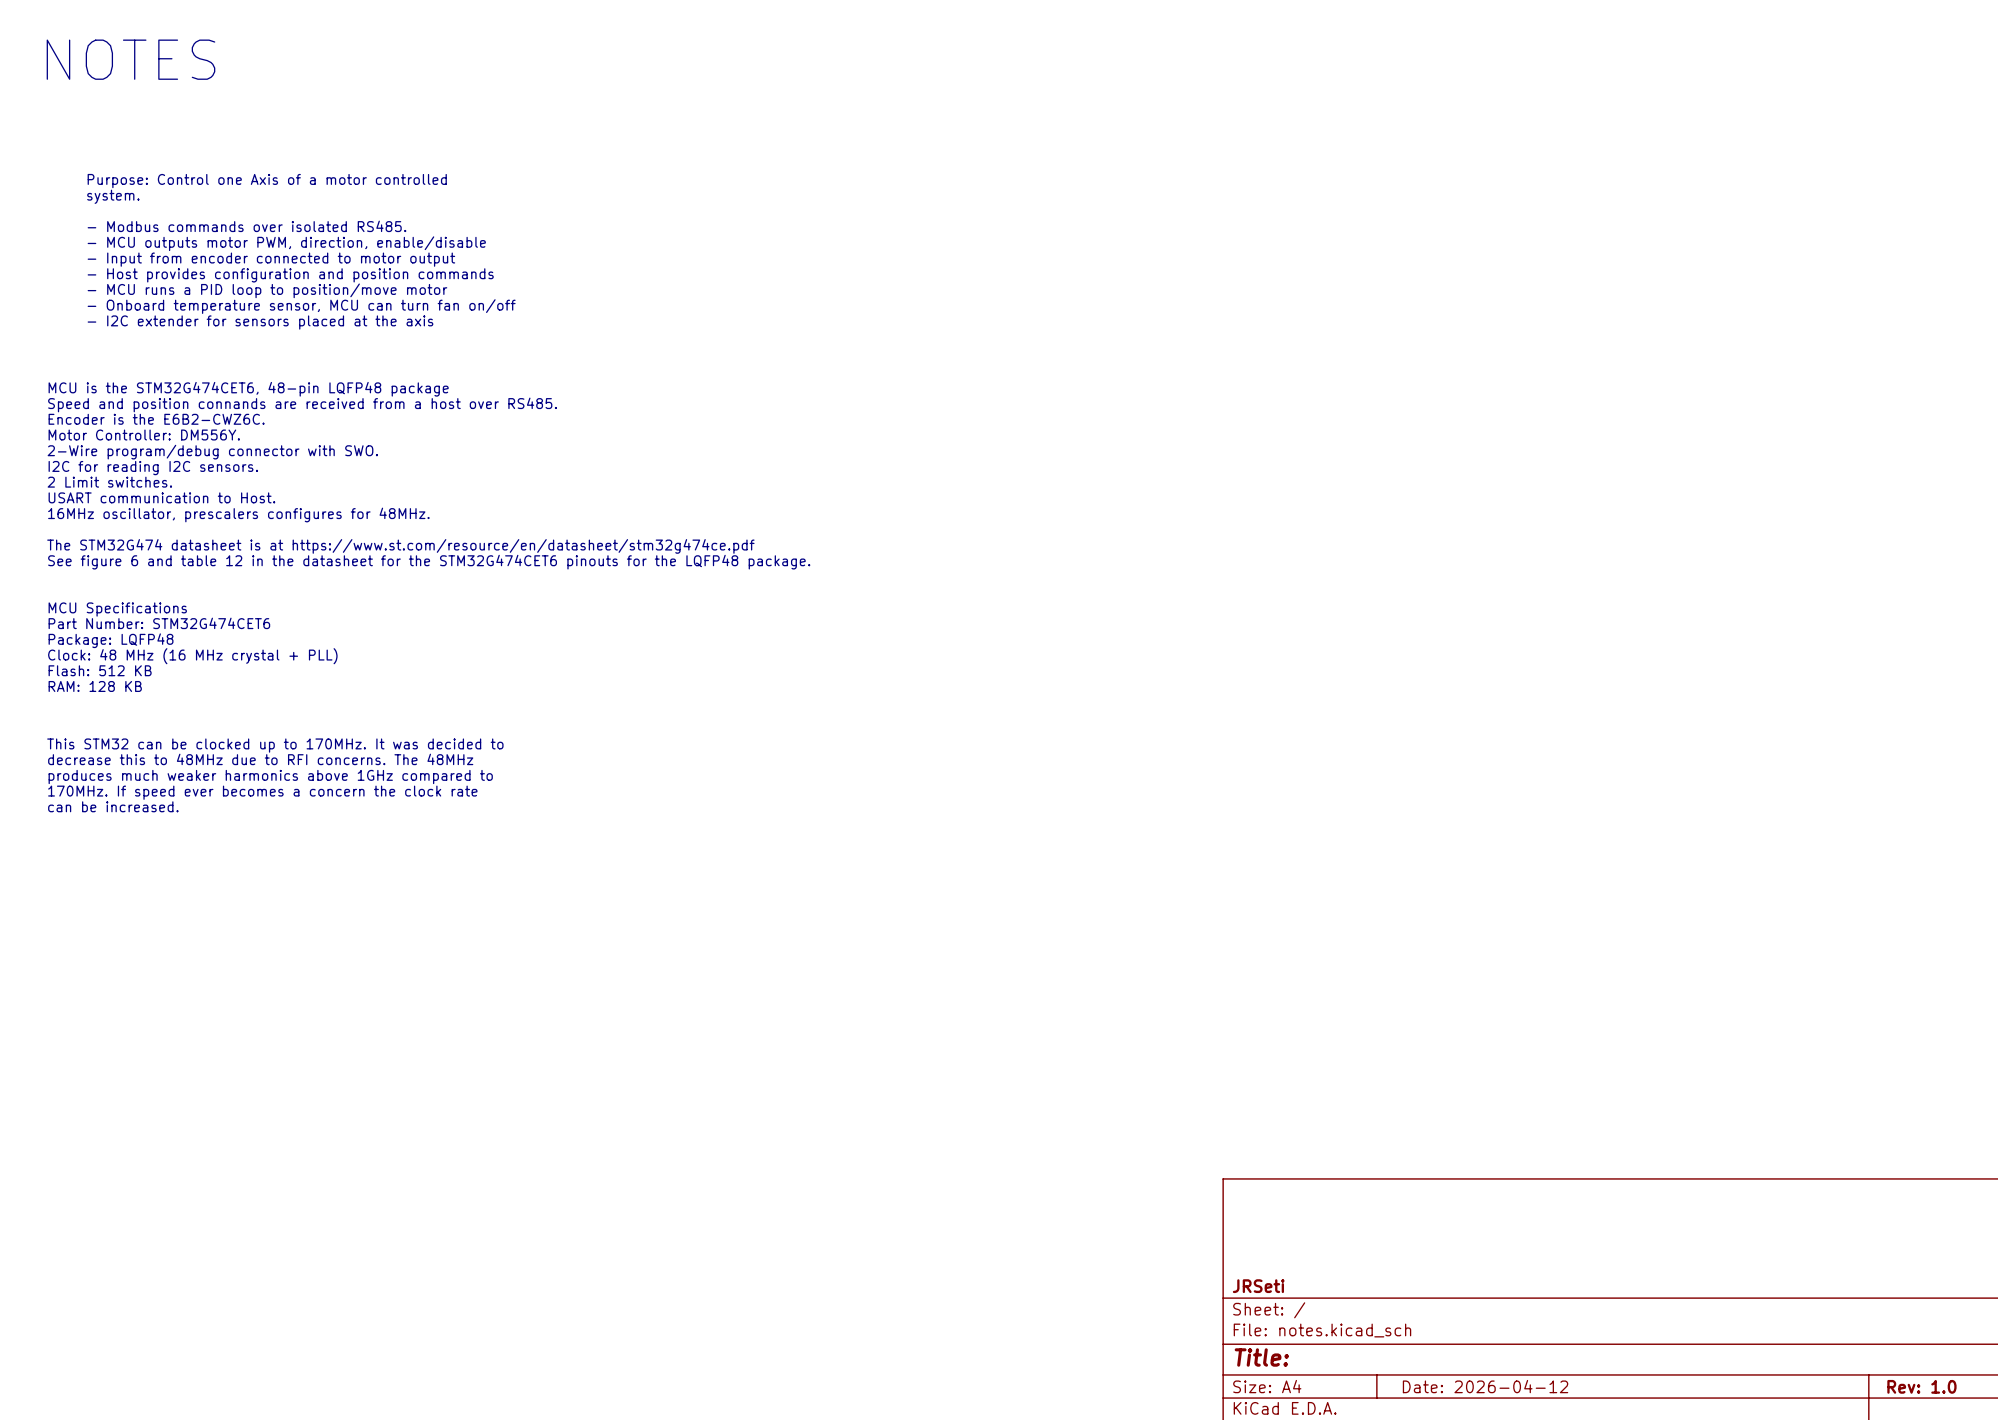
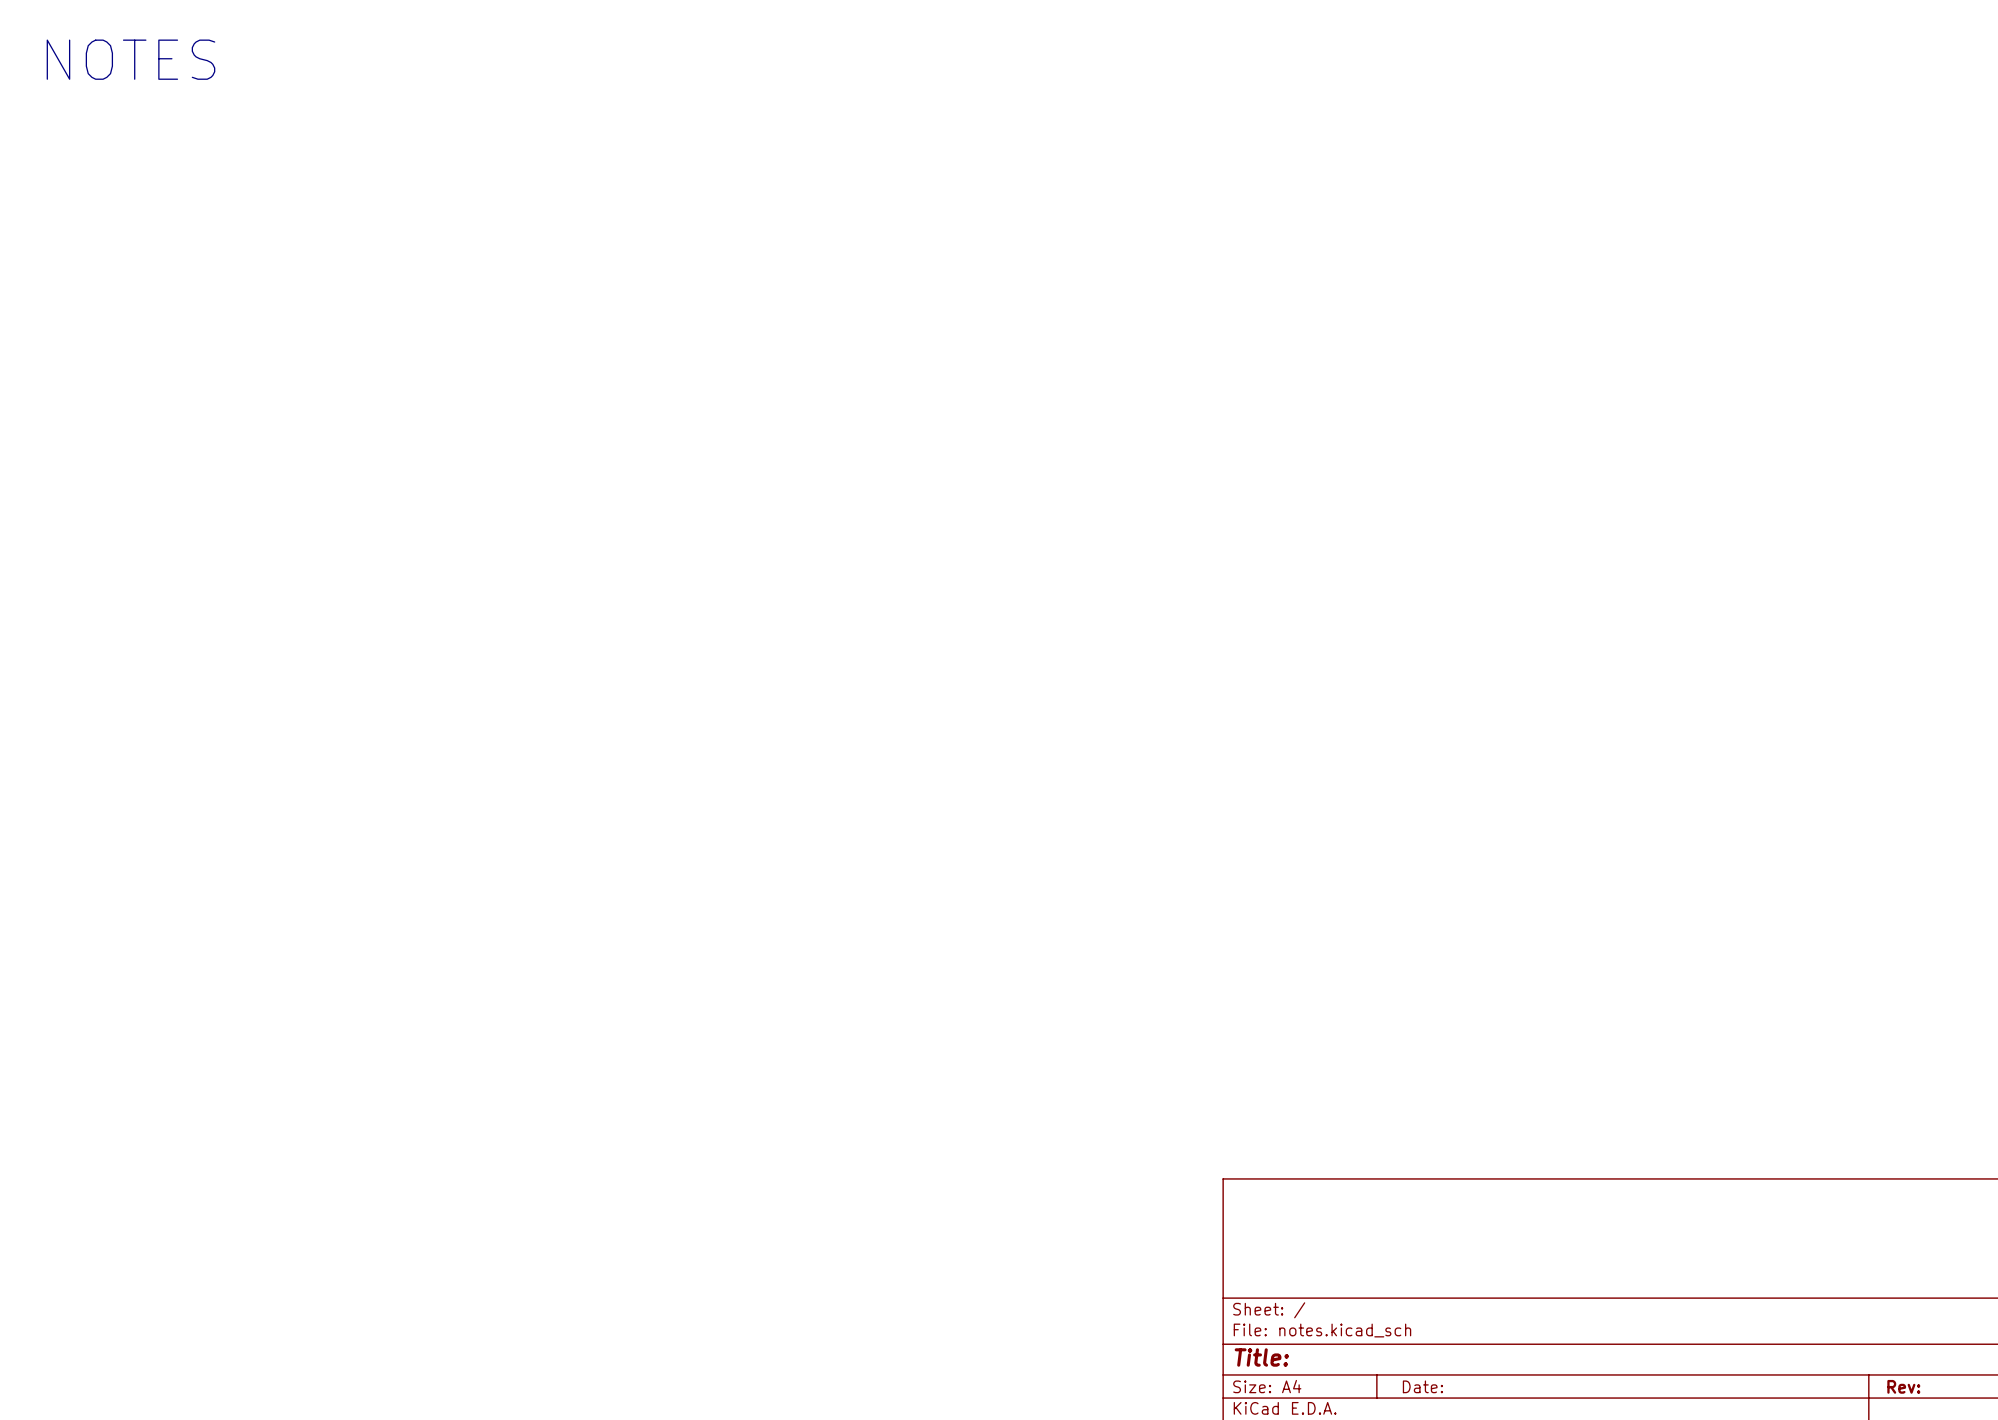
text: Purpose: Control one Axis of a motor controlled (267, 181) -> none
text: system. (113, 196) -> none
text: - Modbus commands over isolated RS485. (247, 226) -> none
text: - MCU outputs motor PWM, direction, enable/disable (286, 243) -> none
text: - Input from encoder connected to motor output (271, 259) -> none
text: - Host provides configuration and position commands (290, 275) -> none
text: - MCU runs a PID loop to position/move motor (267, 290) -> none
text: - Onboard temperature sensor, MCU can turn fan on/off (301, 306) -> none
text: - I2C extender for sensors placed at the axis (260, 322) -> none
text: MCU is the STM32G474CET6, 48-pin LQFP48 package (248, 389) -> none
text: Speed and position connands are received from a host over RS485. (302, 404) -> none
text: Encoder is the E6B2-CWZ6C. (156, 419) -> none
text: Motor Controller: DM556Y. (144, 435) -> none
text: 2-Wire program/debug connector with SWO. (212, 452) -> none
text: I2C for reading I2C sensors. (153, 468) -> none
text: 2 Limit switches. (109, 482) -> none
text: USART communication to Host. (161, 497) -> none
text: 16MHz oscillator, prescalers configures for 48MHz. (238, 514) -> none
text: The STM32G474 datasheet is at https://www.st.com/resource/en/datasheet/stm32g474ce.pdf (400, 546) -> none
text: See figure 6 and table 12 in the datasheet for the STM32G474CET6 pinouts for the LQFP48 package. (429, 562) -> none
text: MCU Specifications (117, 609) -> none
text: Part Number: STM32G474CET6 (159, 623) -> none
text: Package: LQFP48 (111, 640) -> none
text: Clock: 48 MHz (16 MHz crystal + PLL) (192, 656) -> none
text: Flash: 512 KB (100, 670) -> none
text: RAM: 128 KB (95, 686) -> none
text: This STM32 can be clocked up to 170MHz. It was decided to (275, 745) -> none
text: decrease this to 48MHz due to RFI concerns. The 48MHz (260, 759) -> none
text: produces much weaker harmonics above 1GHz compared to (270, 776) -> none
text: 170MHz. If speed ever becomes a concern the clock rate (262, 792) -> none
text: can be increased. (113, 806) -> none
title block: JRSeti (1258, 1286) -> none
title block: Date: 2026-04-12 (1485, 1386) -> Date: (1422, 1386)
title block: Rev: 1.0 (1921, 1386) -> Rev: (1903, 1386)

